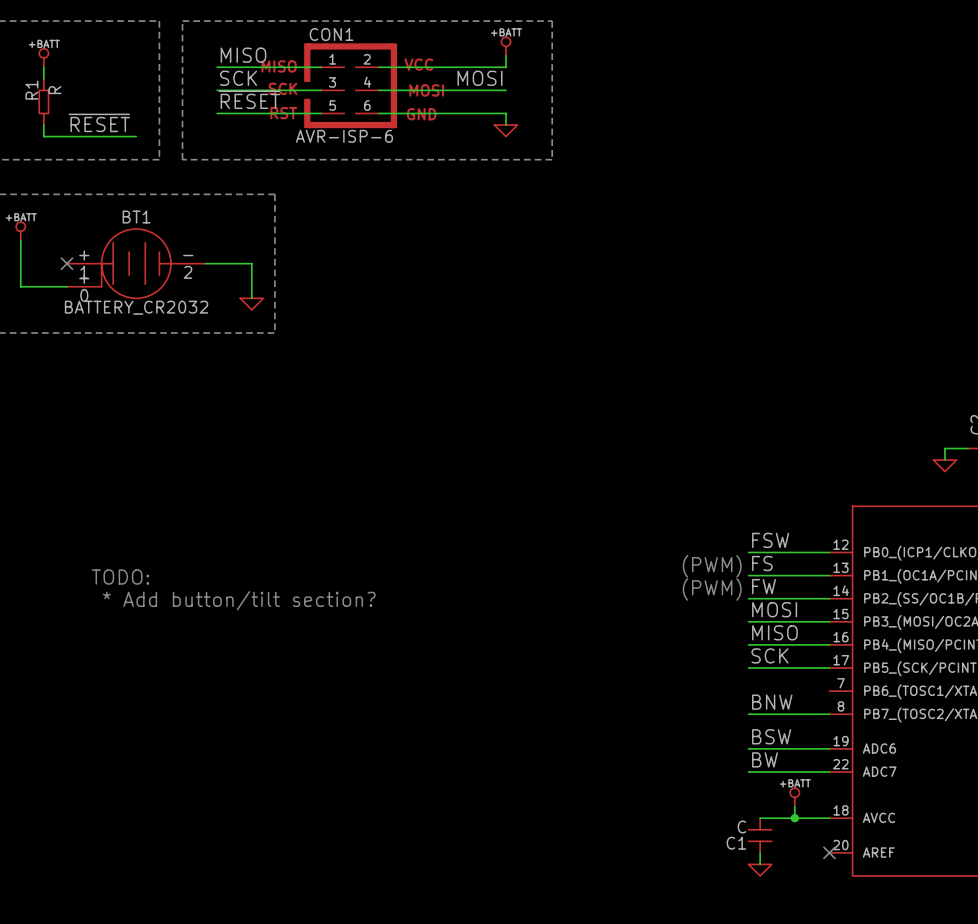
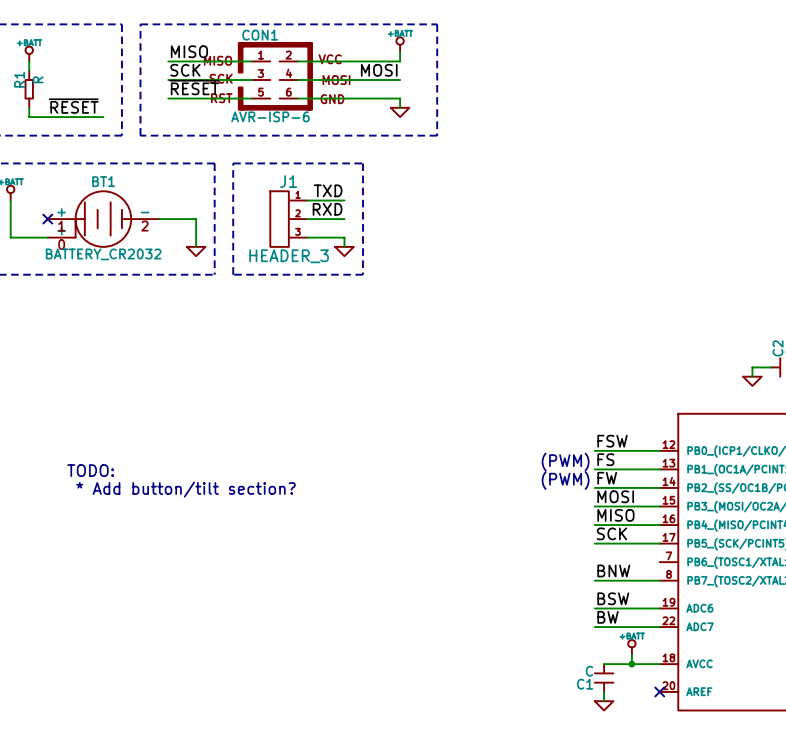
line: none -> (233, 163) (363, 163) (363, 274) (233, 274) (233, 163)
label: none -> TXD (328, 190)
wire: none -> (307, 200) (344, 200)
label: none -> RXD (327, 209)
J1: none -> HEADER_3 (288, 219)
wire: none -> (307, 219) (344, 219)
wire: none -> (307, 237) (344, 237) (344, 246)
power symbol: none -> (344, 251)

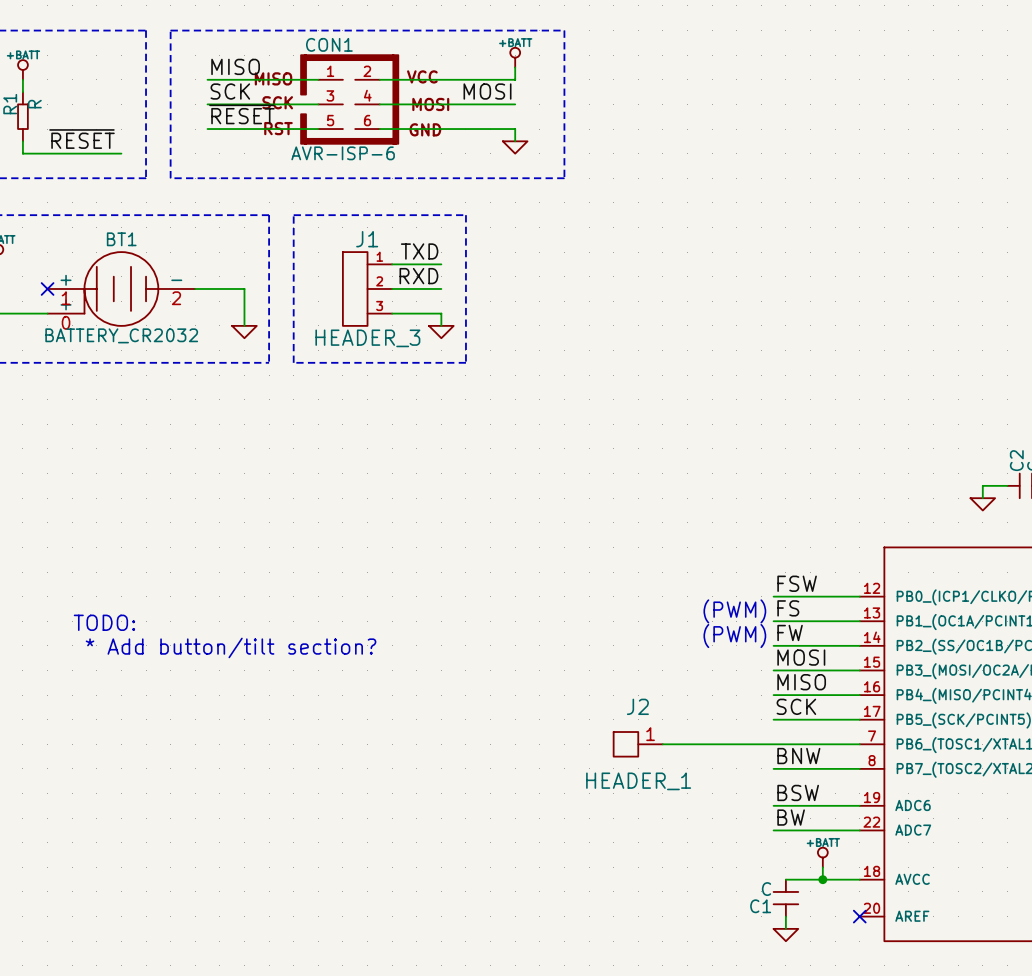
J2: none -> HEADER_1 (638, 744)
wire: none -> (662, 744) (859, 744)

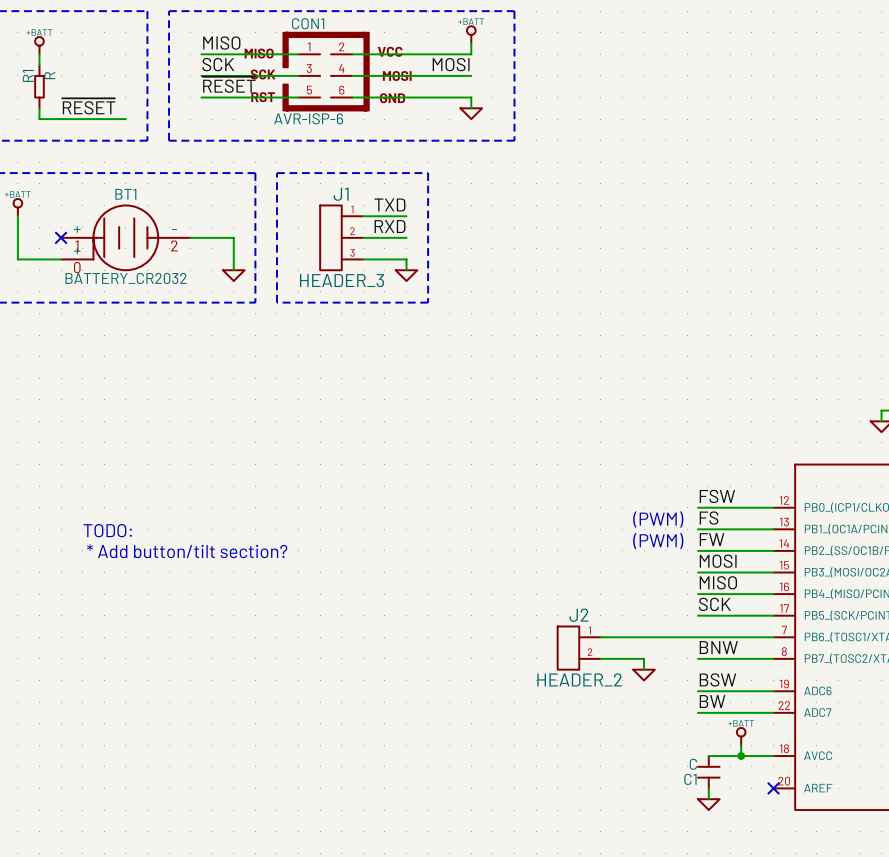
J2 symbol: [613, 732, 663, 757] -> [557, 626, 601, 670]
wire: none -> (600, 658) (644, 658) (644, 669)
J2 value: HEADER_1 (638, 781) -> HEADER_2 (579, 679)
power symbol: none -> (644, 675)

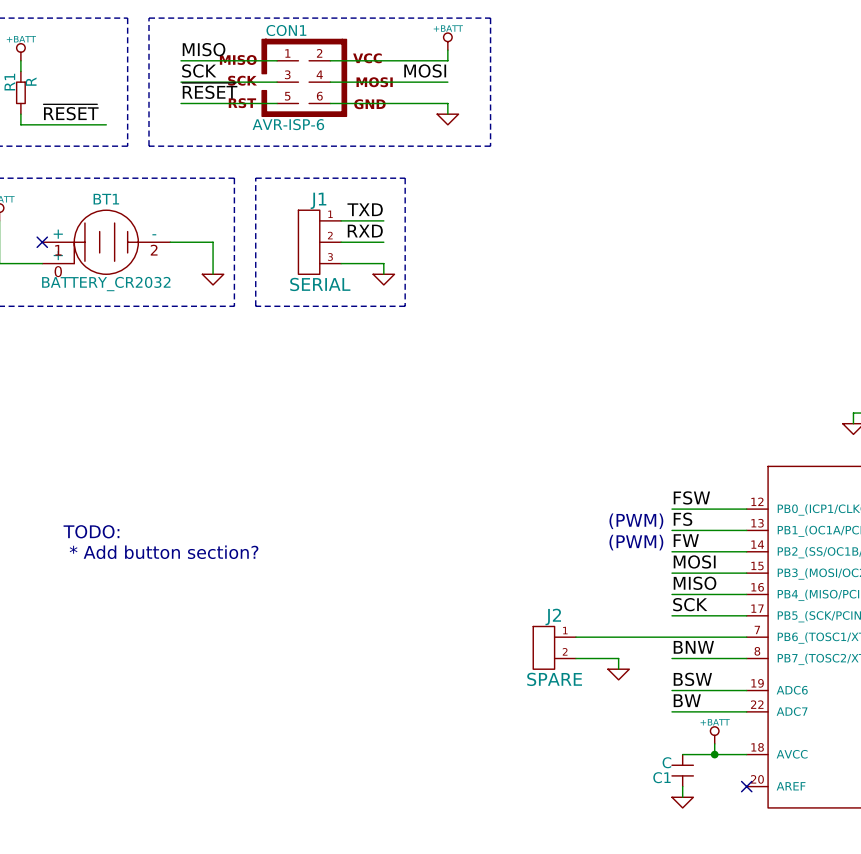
J1 value: HEADER_3 (342, 280) -> SERIAL (320, 284)
text: * Add button/tilt section? (187, 551) -> * Add button section? (164, 552)
J2 value: HEADER_2 (579, 679) -> SPARE (554, 679)

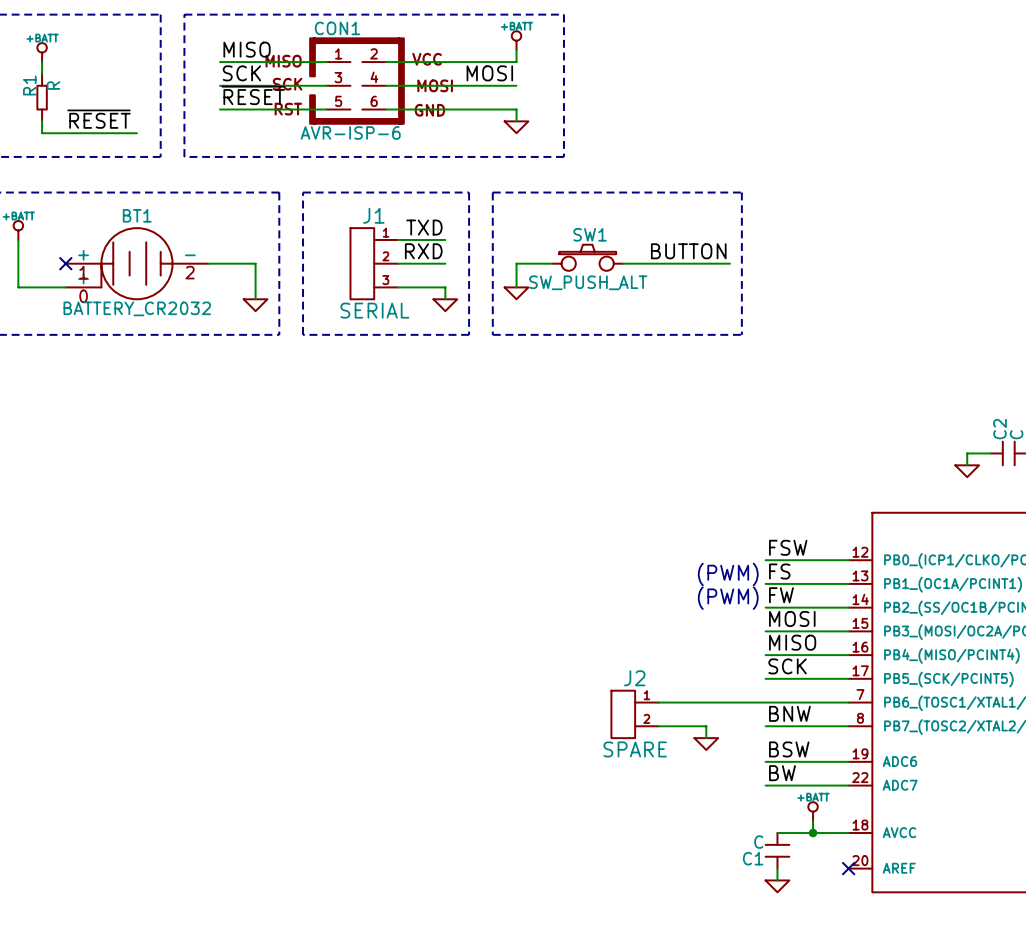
line: none -> (492, 192) (492, 334) (741, 334) (741, 192) (492, 192)
label: none -> BUTTON (688, 251)
SW1: none -> SW_PUSH_ALT (587, 257)
wire: none -> (552, 263) (516, 263) (516, 287)
wire: none -> (623, 263) (730, 263)
power symbol: none -> (516, 293)
text: TODO: (91, 531) -> none
text: * Add button section? (164, 552) -> none

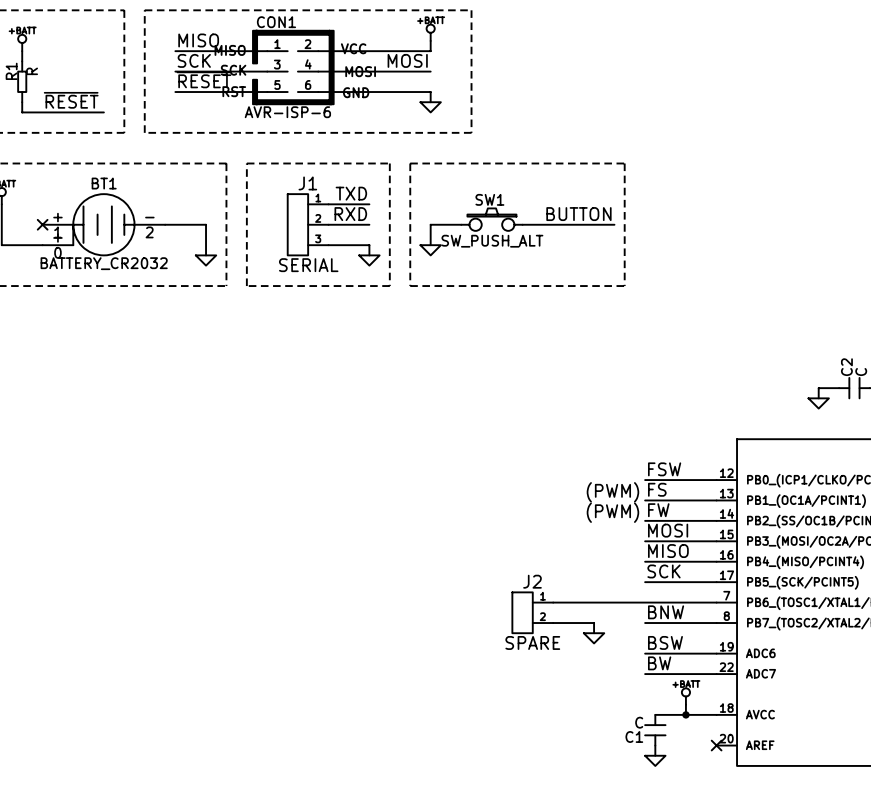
SW1 flip: as is (587, 249) -> left-right (491, 212)

